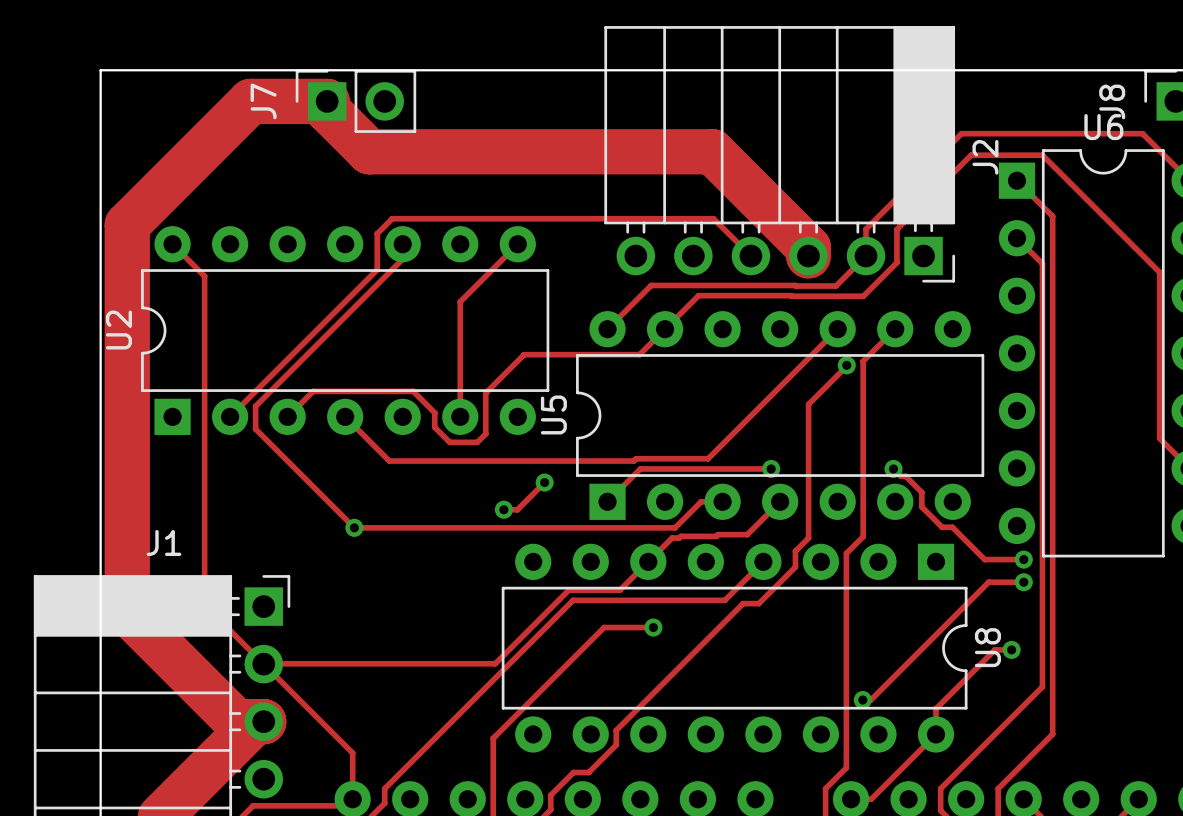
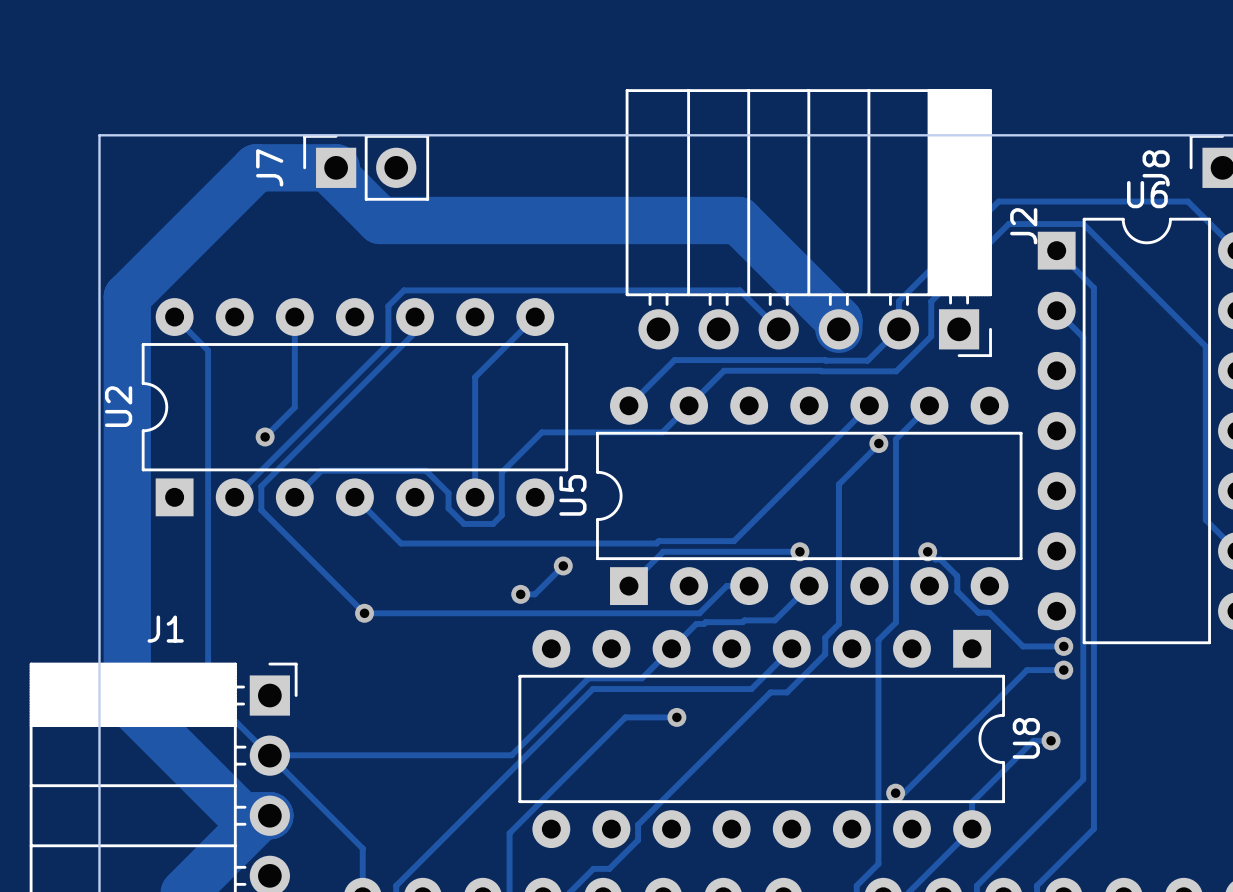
track: none -> (294, 317) (294, 407) (265, 437)
via: none -> (265, 437)

